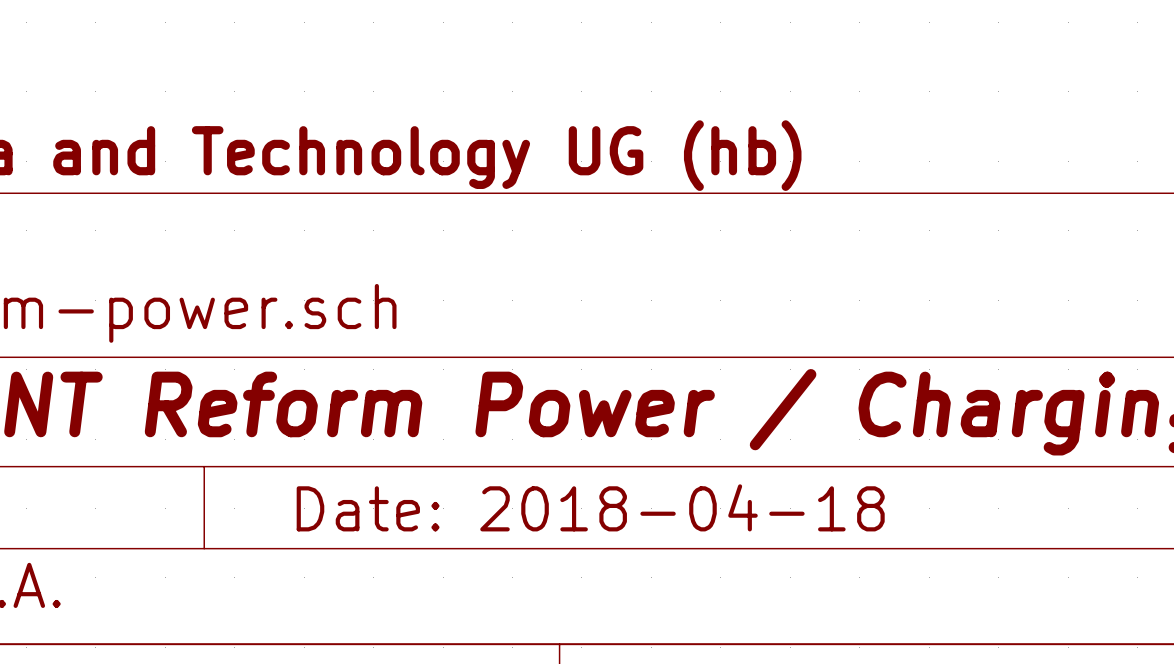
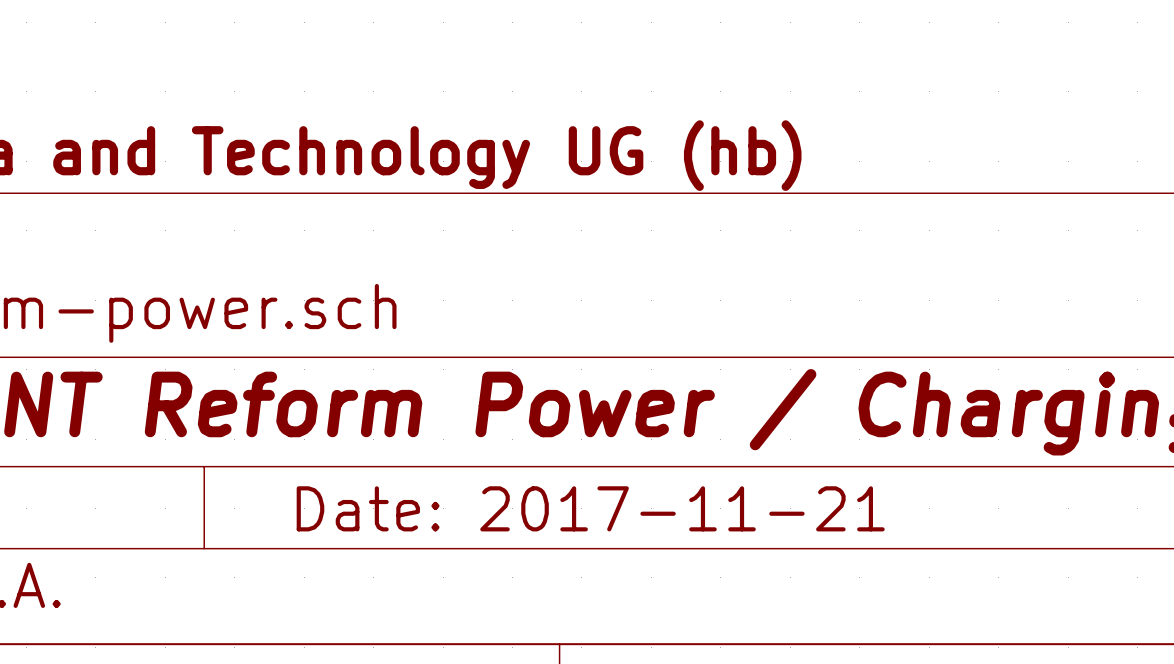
title block: Date: 2018-04-18 (590, 507) -> Date: 2017-11-21 (590, 508)

